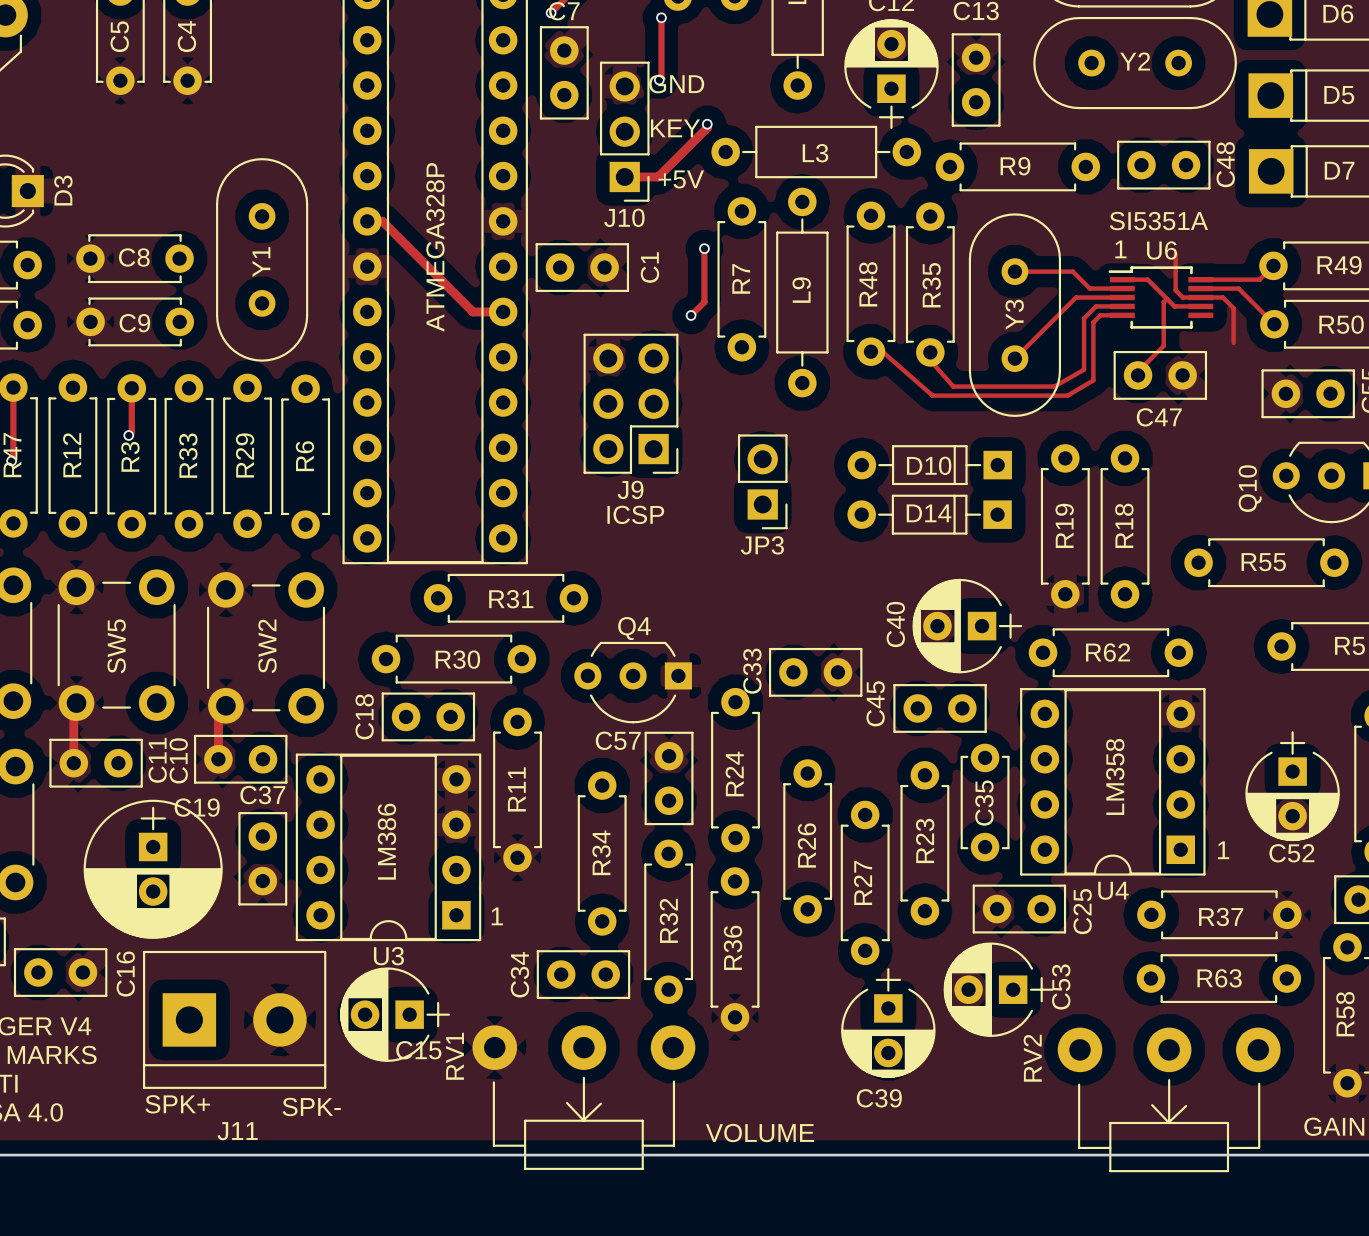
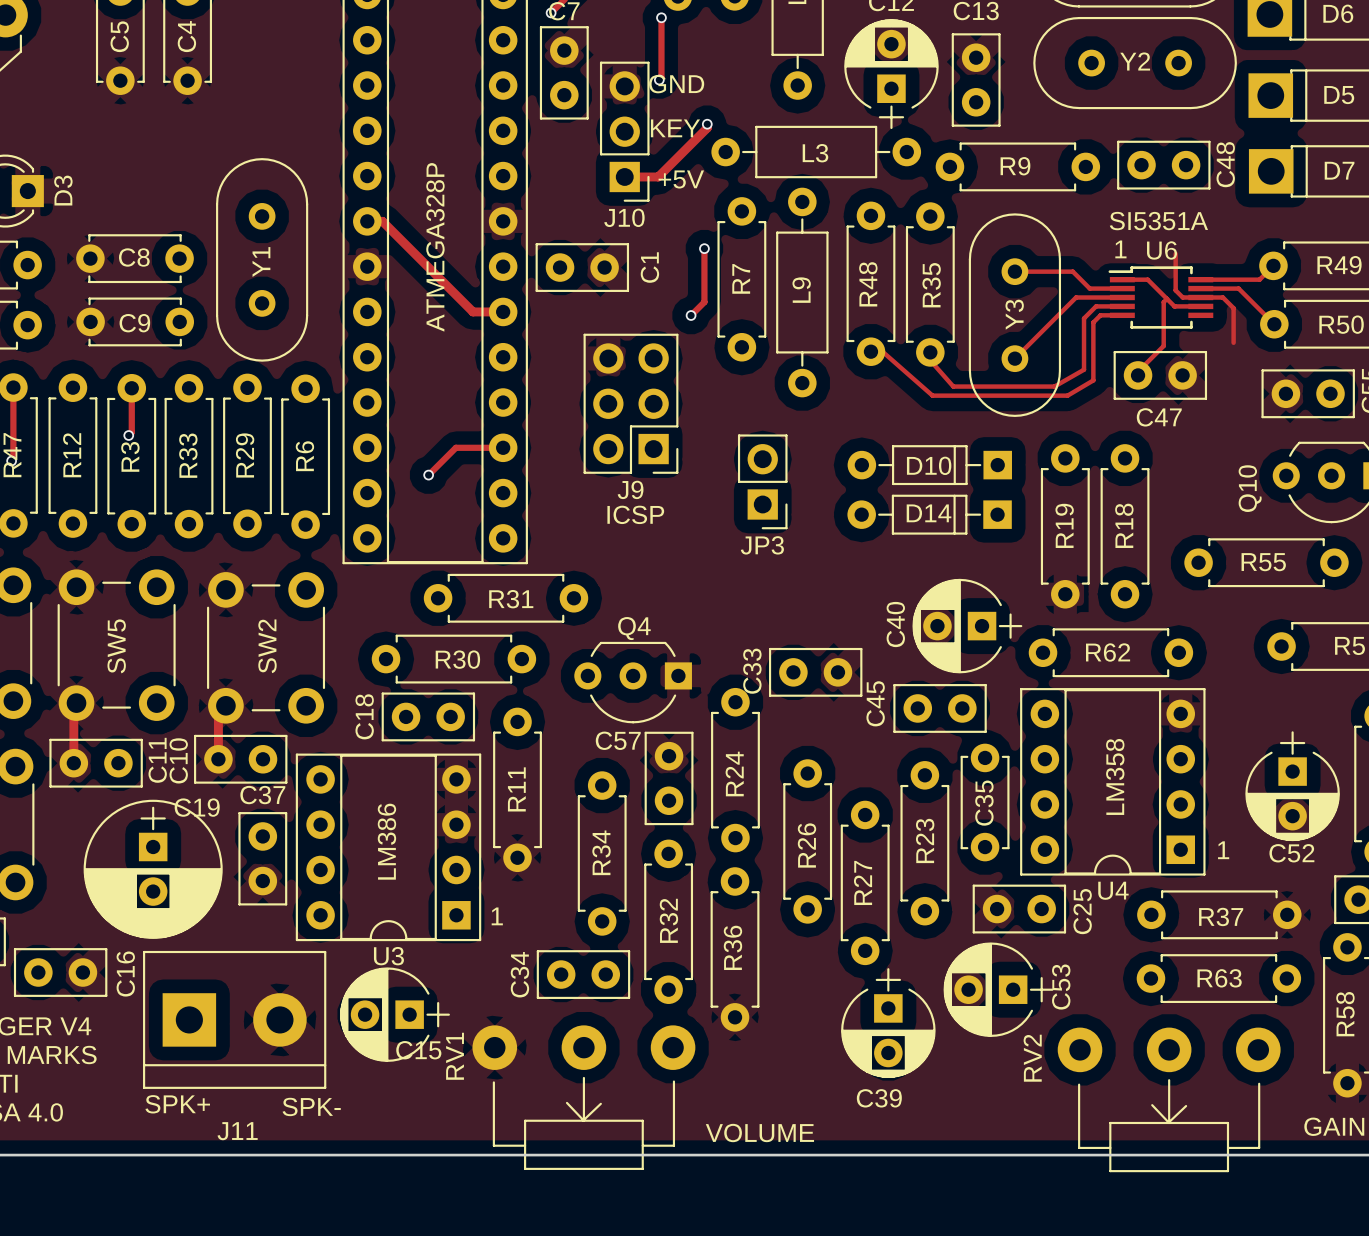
track: none -> (503, 447) (455, 447) (428, 475)
via: none -> (428, 475)

